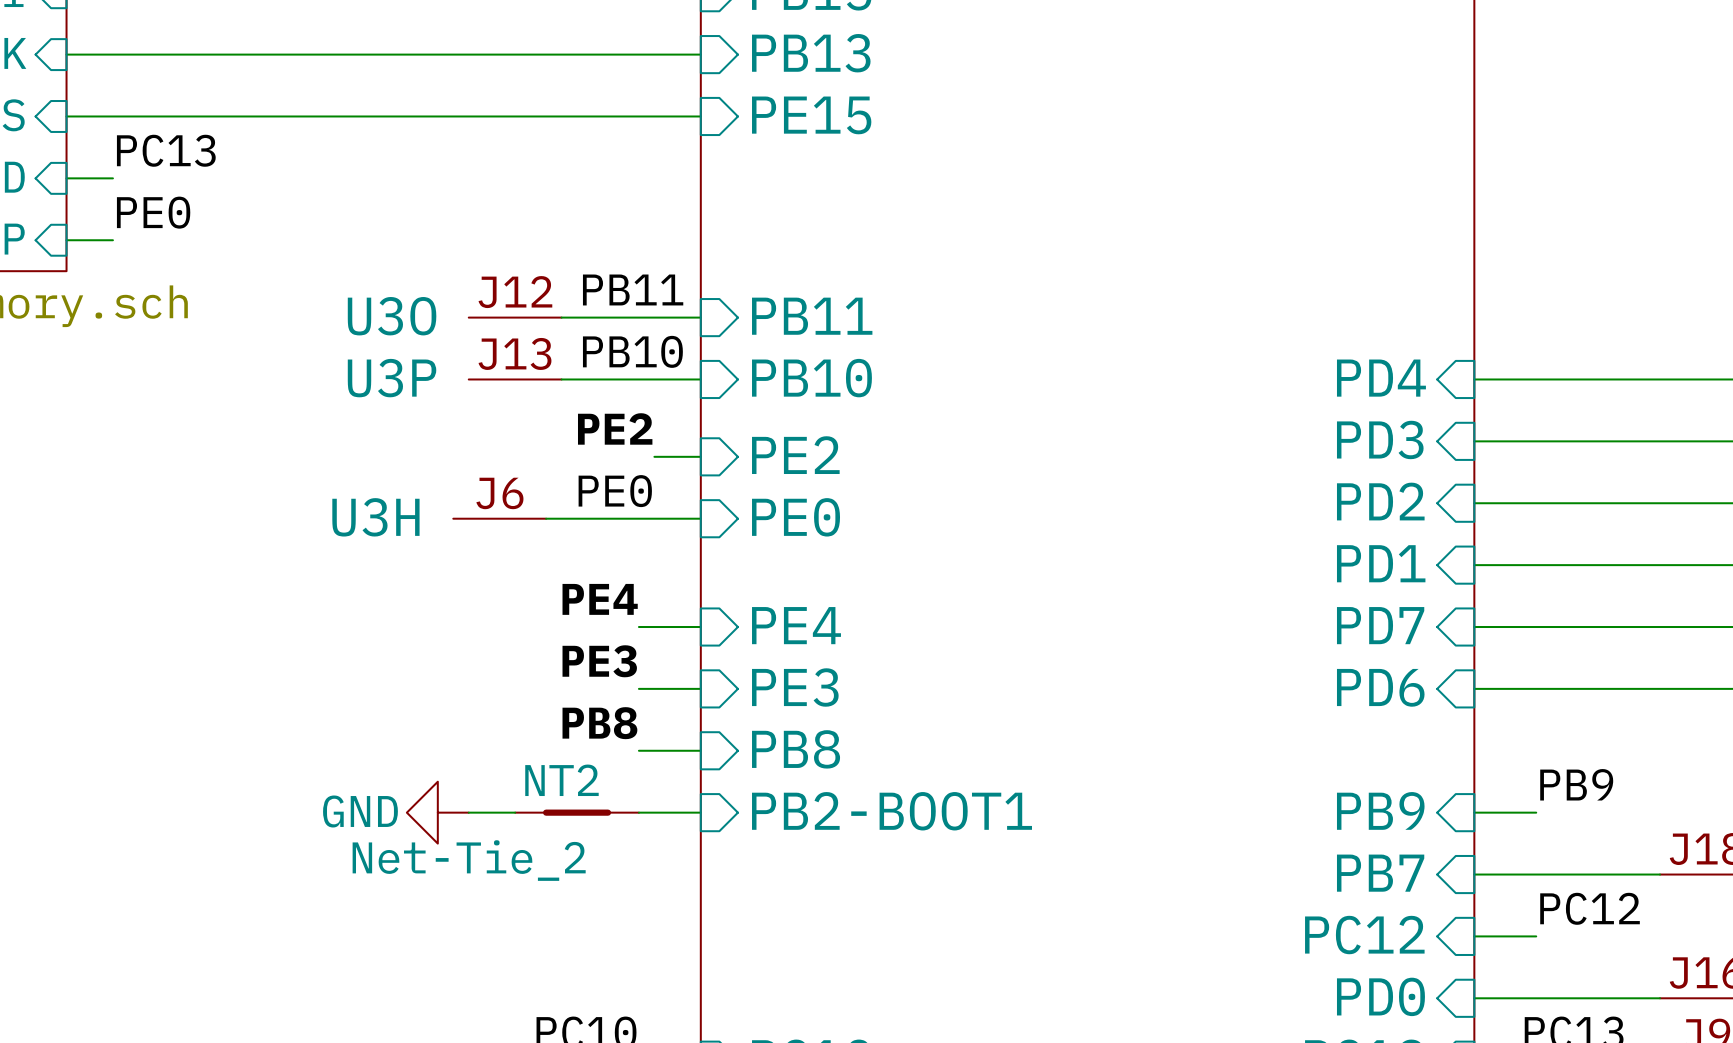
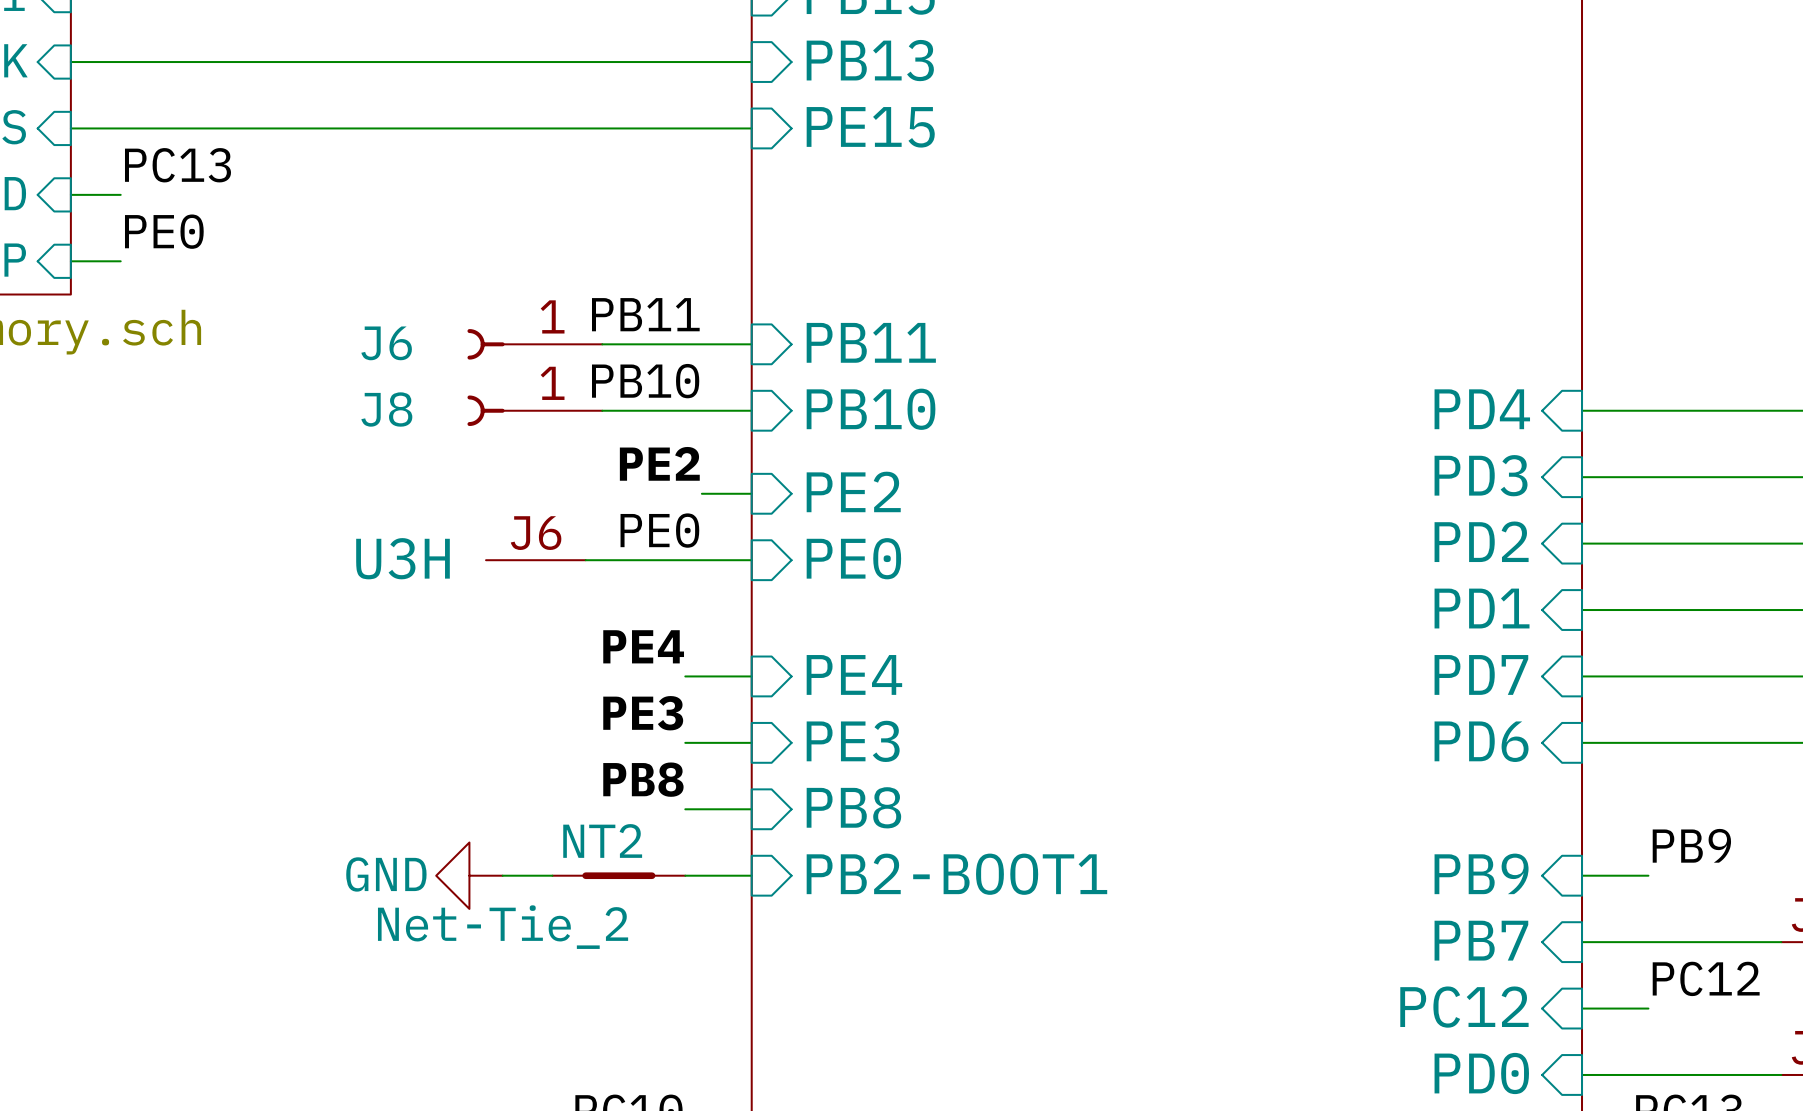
label position: PB11 (633, 289) -> PB11 (645, 314)
J6: none -> (534, 344)
U3O: (515, 317) -> none
label position: PB10 (632, 351) -> PB10 (645, 381)
J8: none -> (534, 410)
U3P: (515, 379) -> none

